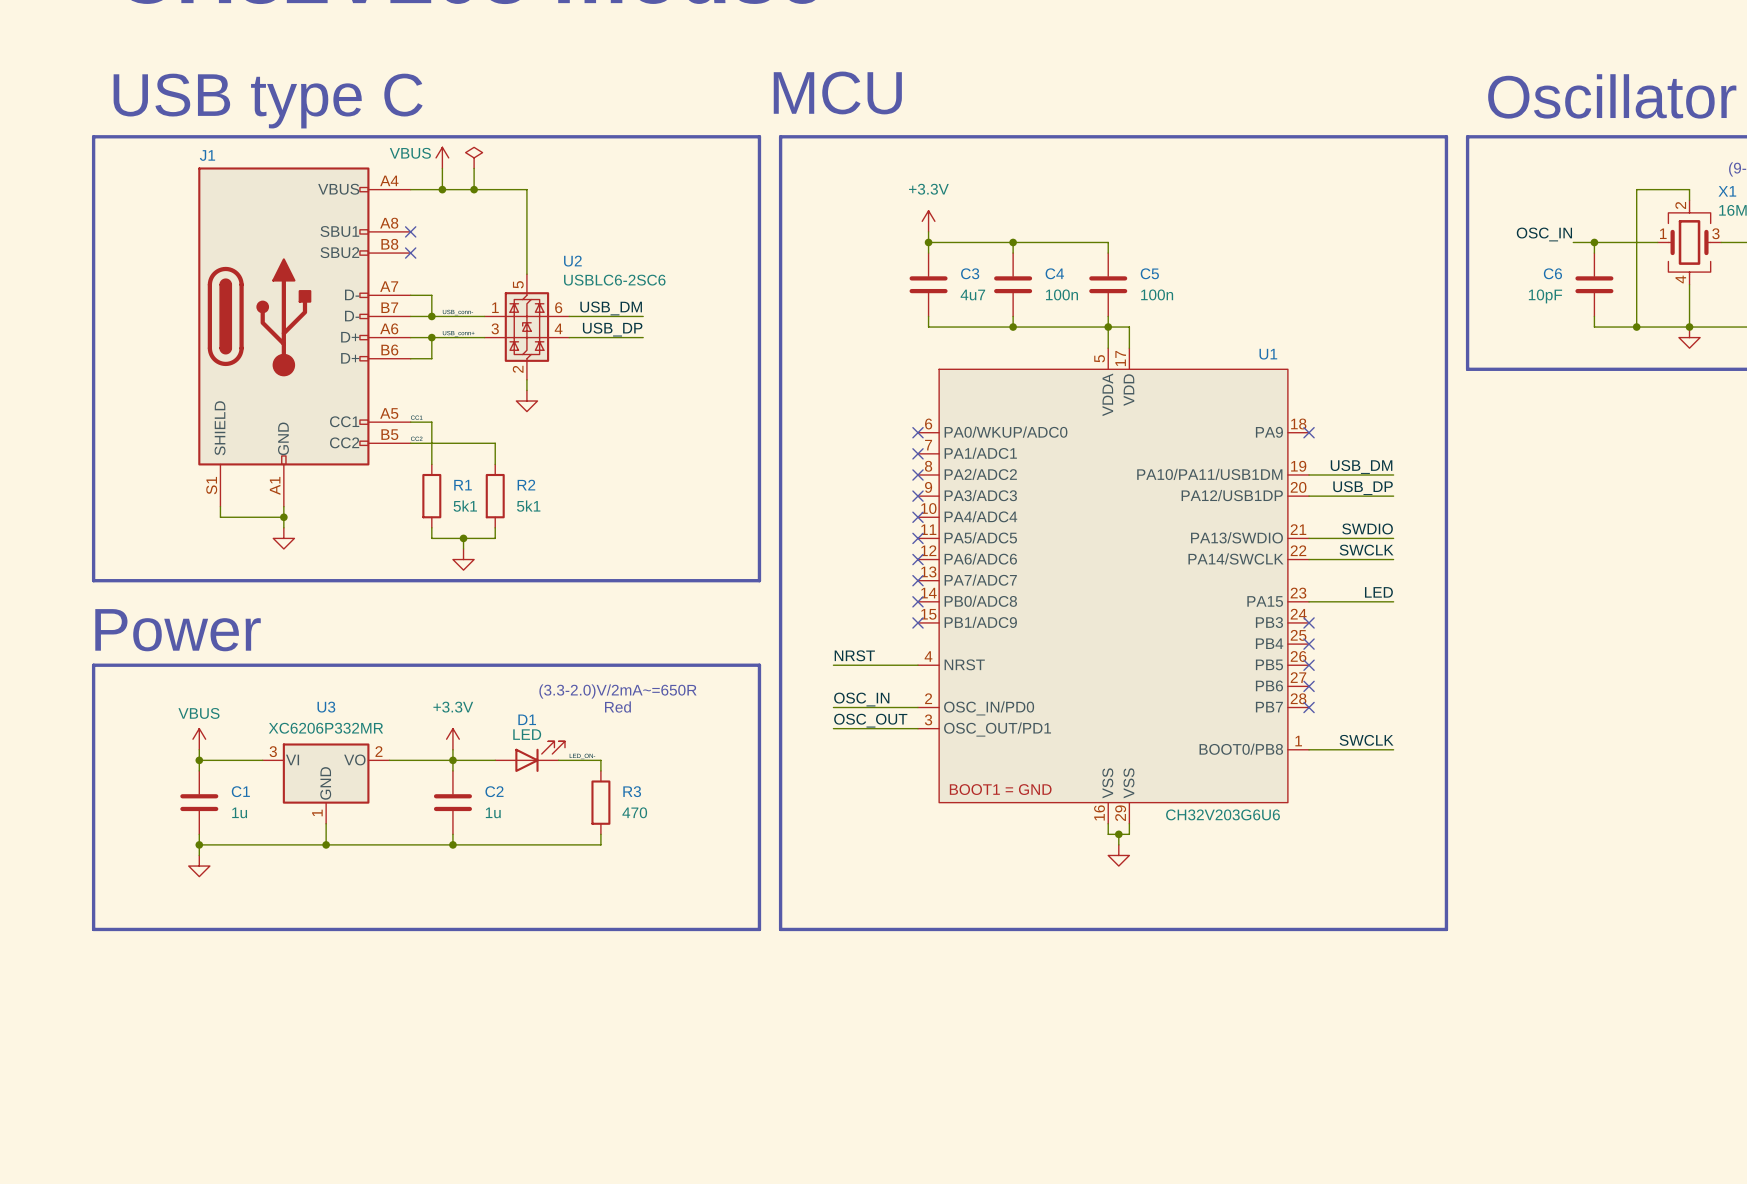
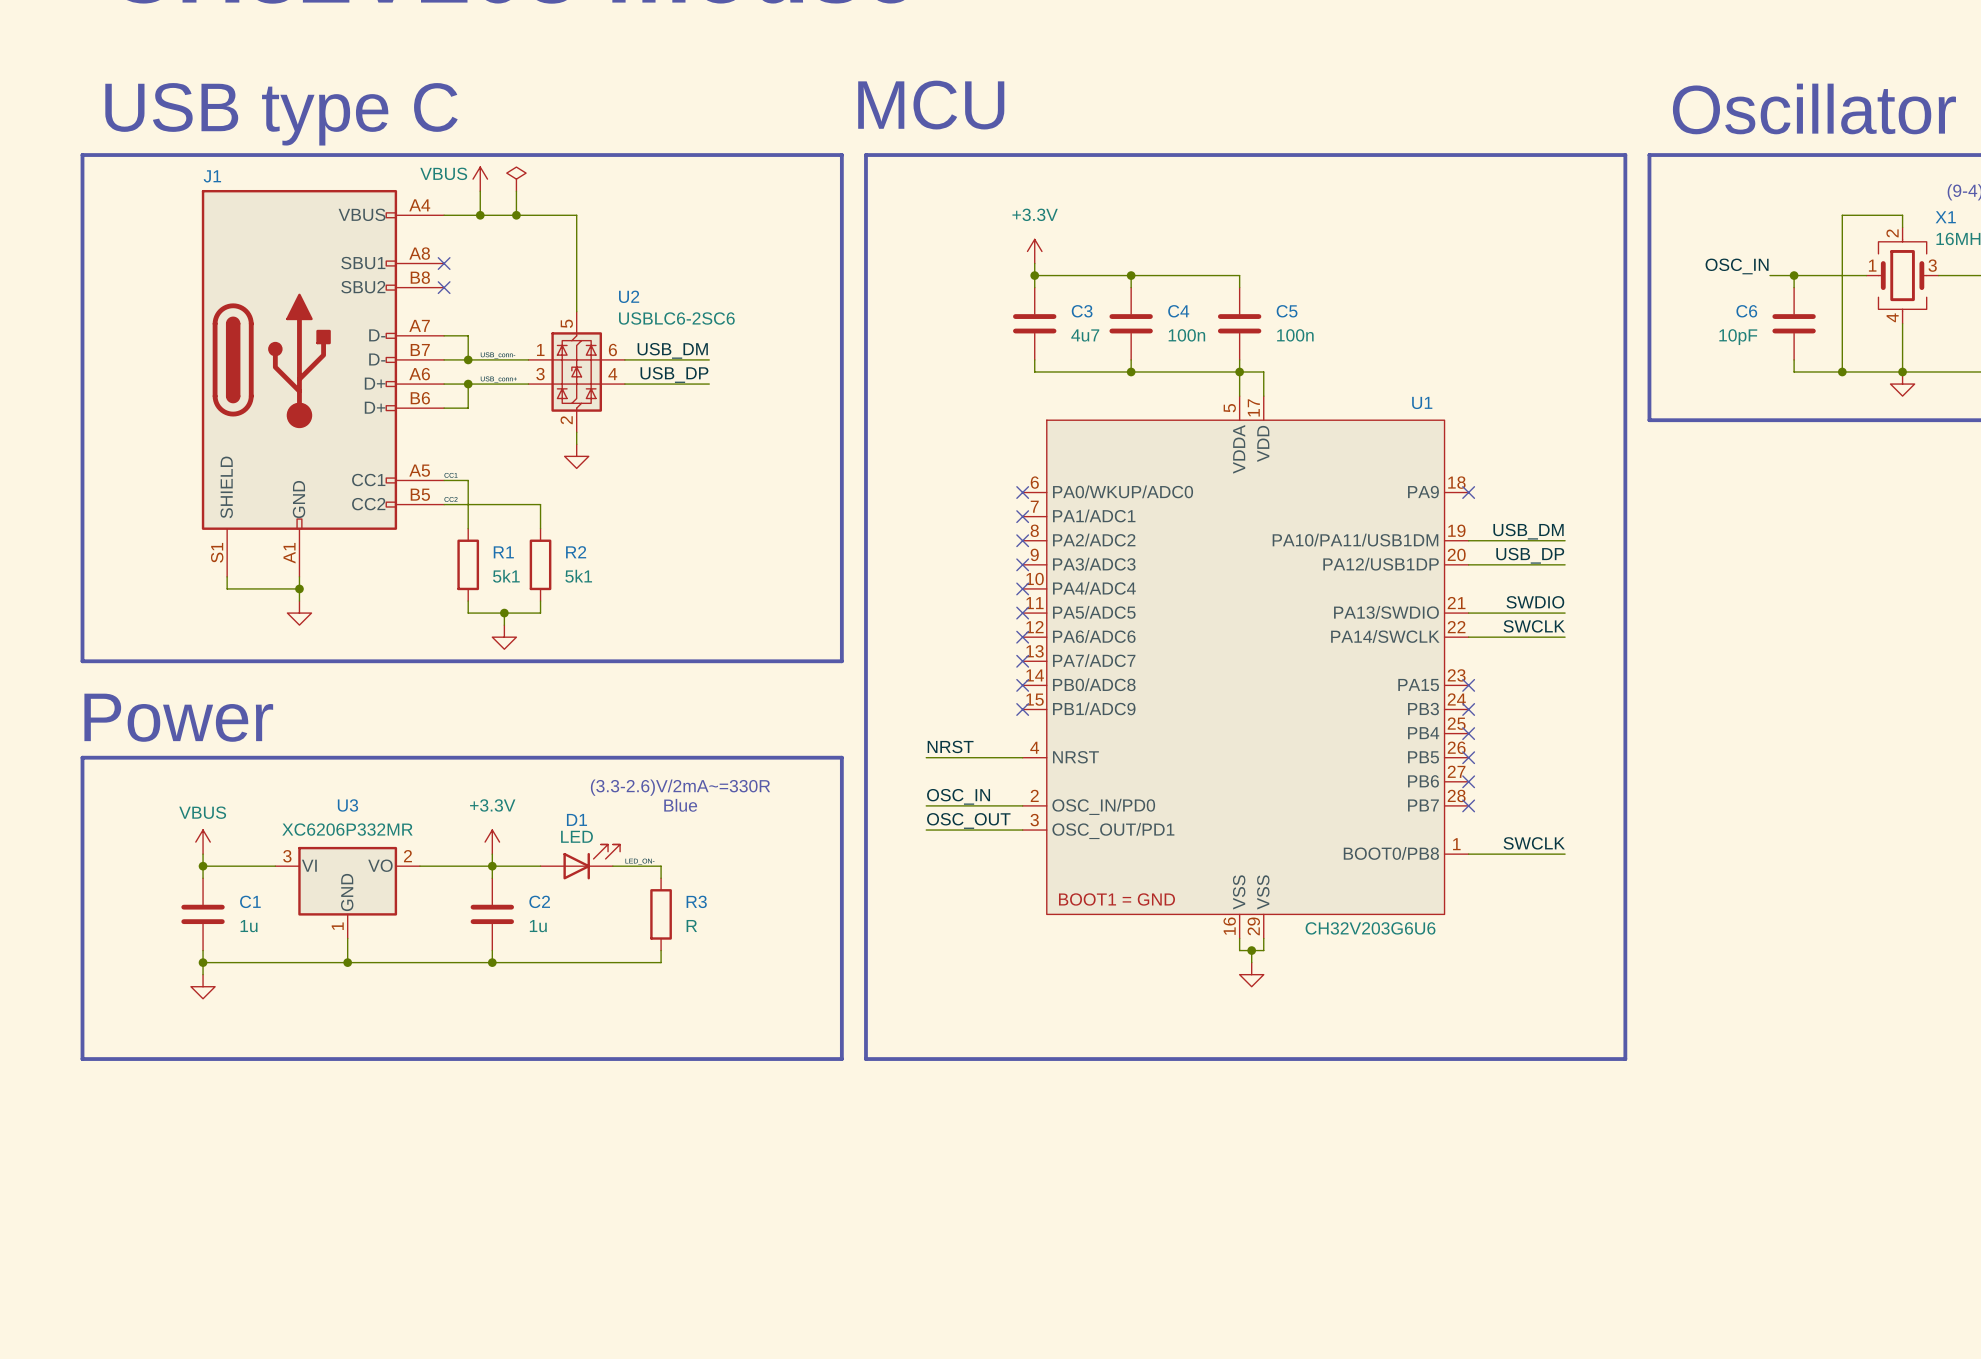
label: LED (1378, 592) -> none
wire: (1309, 601) (1393, 601) -> none
no-connect mark: none -> (1468, 685)
text: (3.3-2.0)V/2mA~=650R (617, 691) -> (3.3-2.6)V/2mA~=330R (680, 787)
text: Red (617, 706) -> Blue (680, 805)
R3 value: 470 (634, 812) -> R (691, 926)

